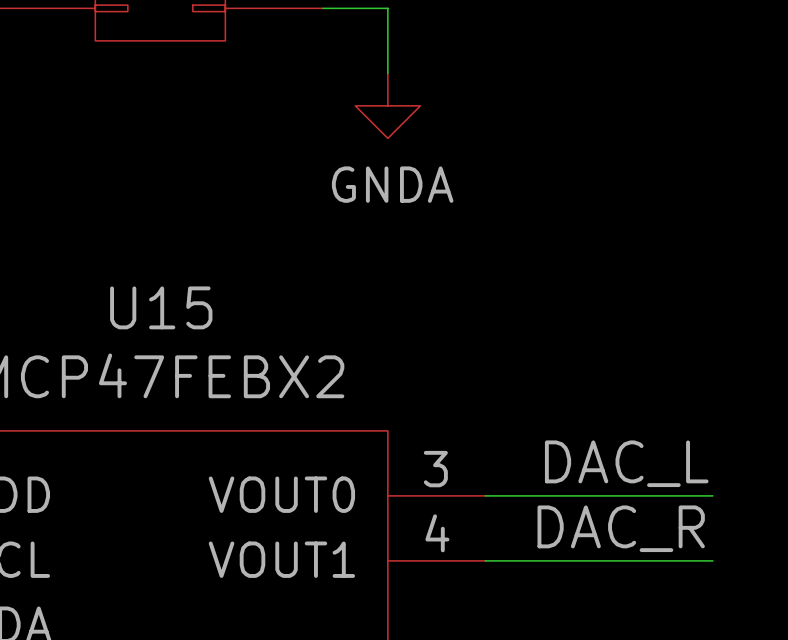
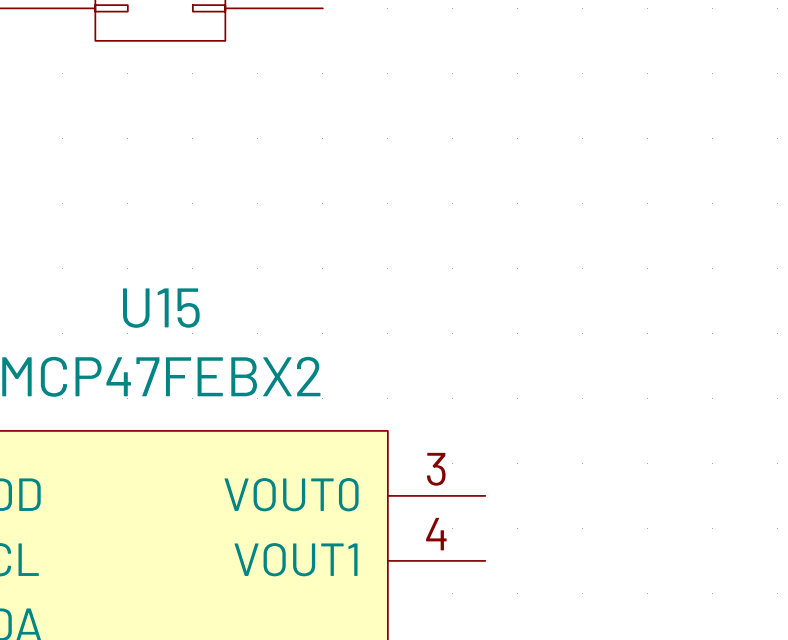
wire: (322, 8) (387, 8) (387, 73) -> none
power symbol: GNDA (387, 105) -> none
label: DAC_L (626, 463) -> none
wire: (485, 495) (712, 495) -> none
label: DAC_R (621, 528) -> none
wire: (485, 560) (712, 560) -> none

